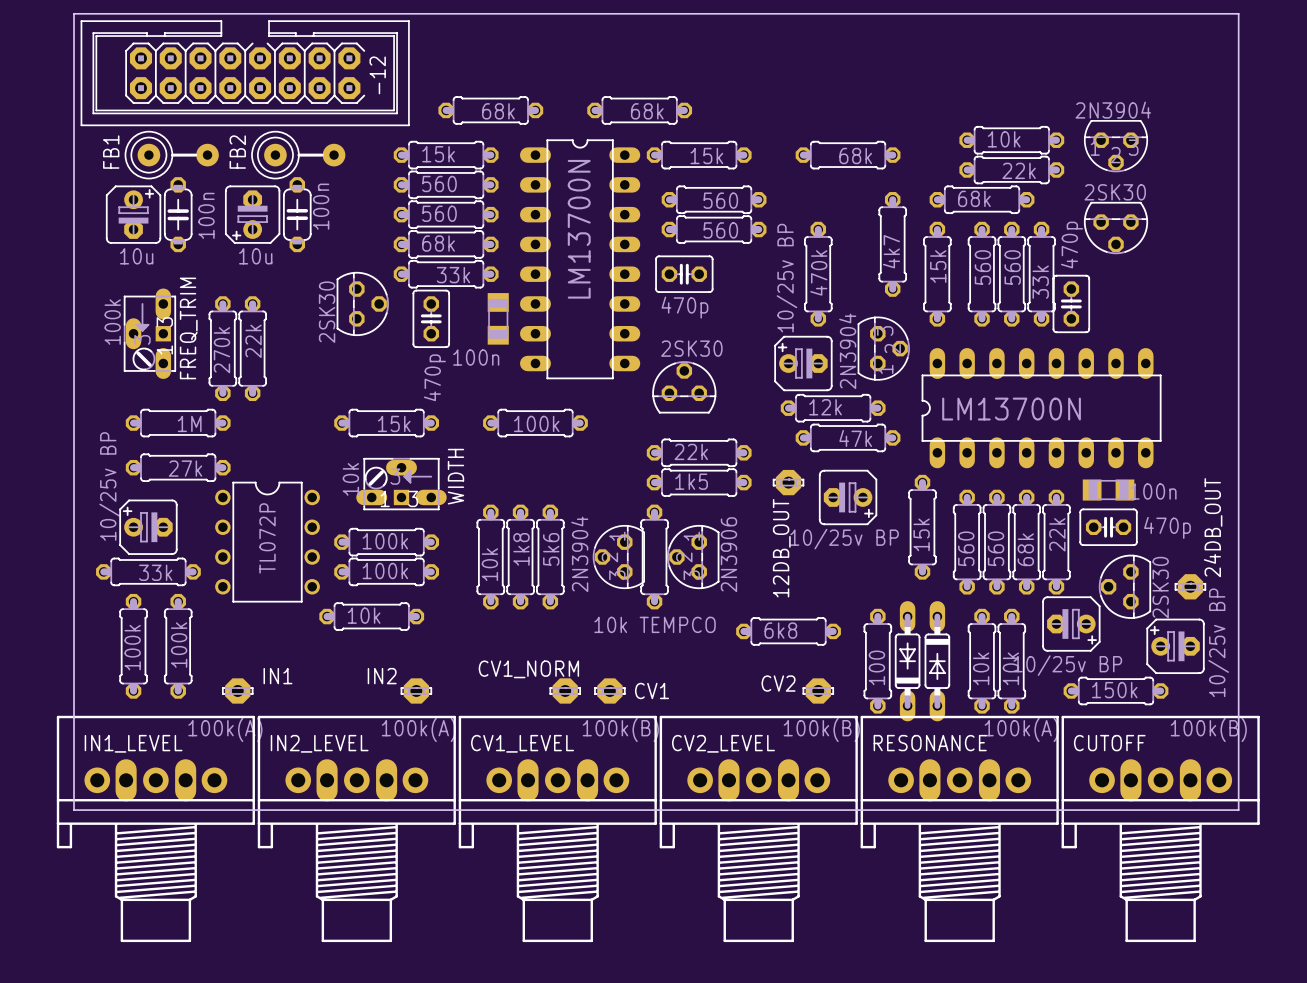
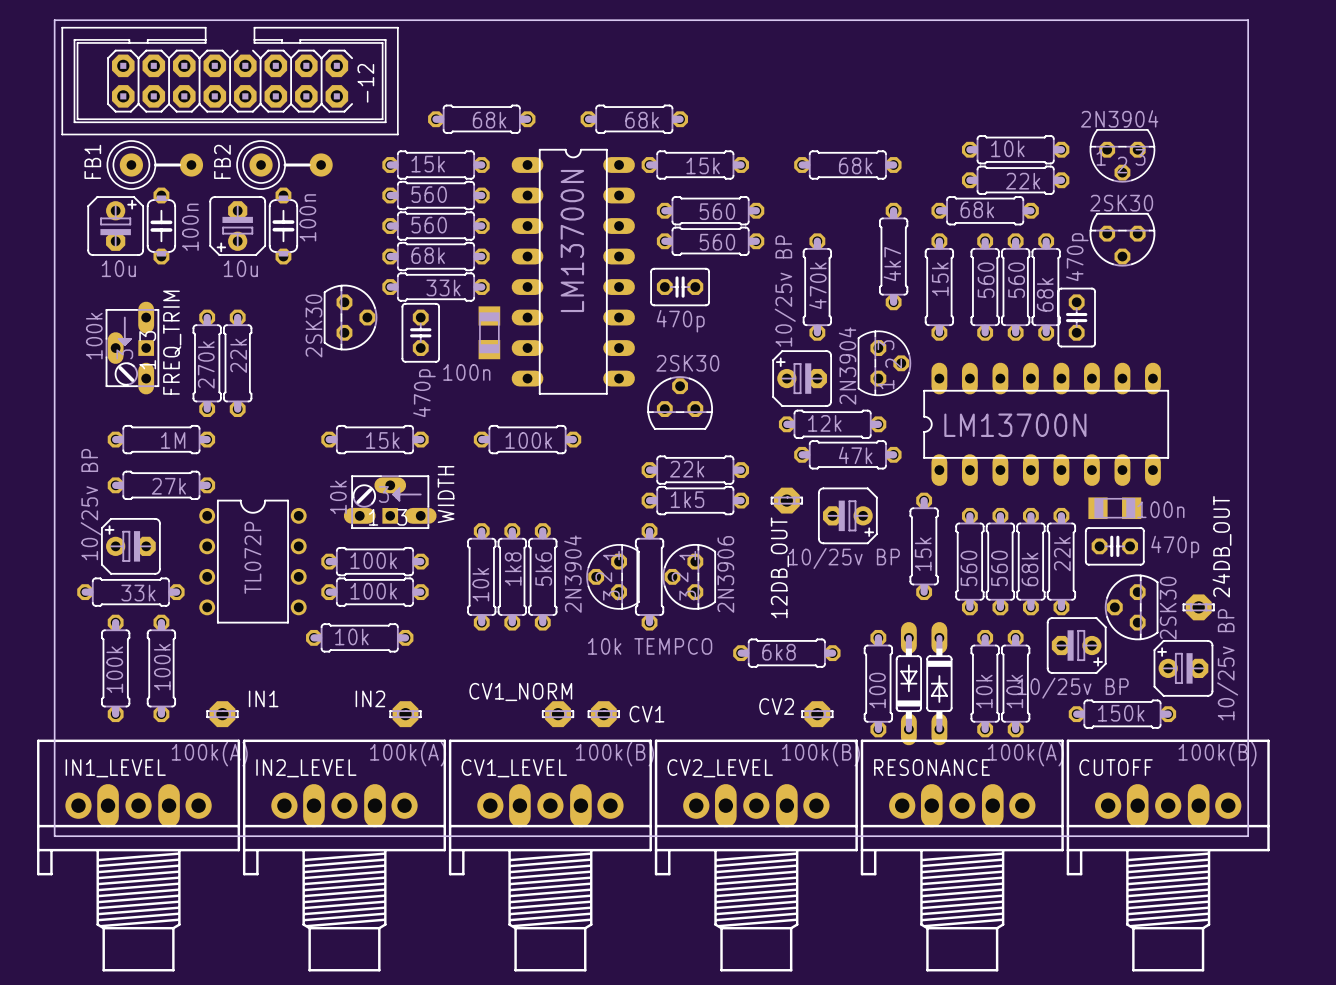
part value: 33k (1040, 282) -> 68k (1045, 294)

